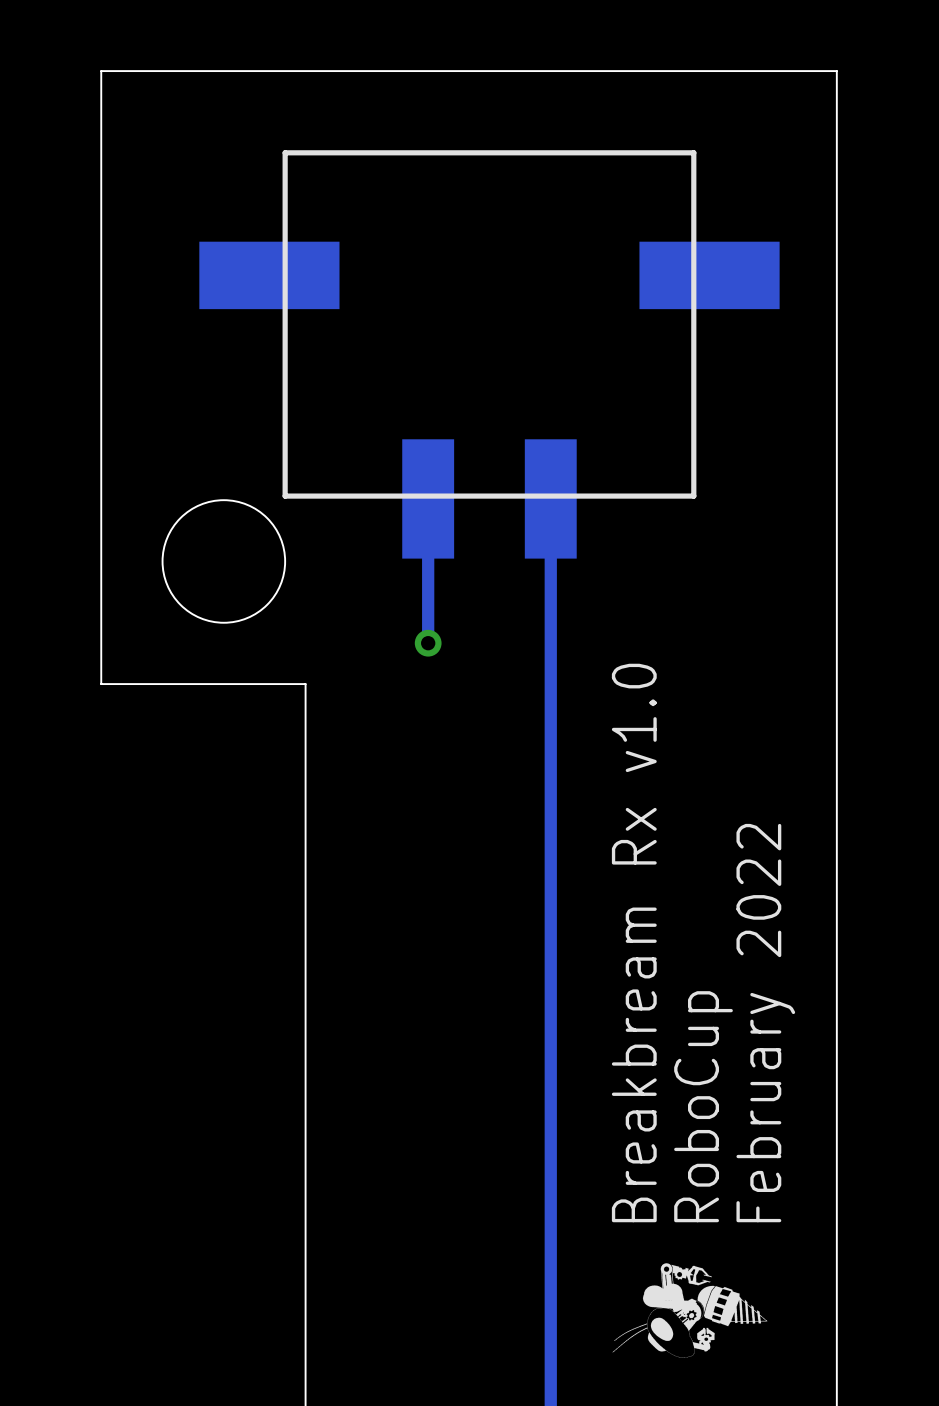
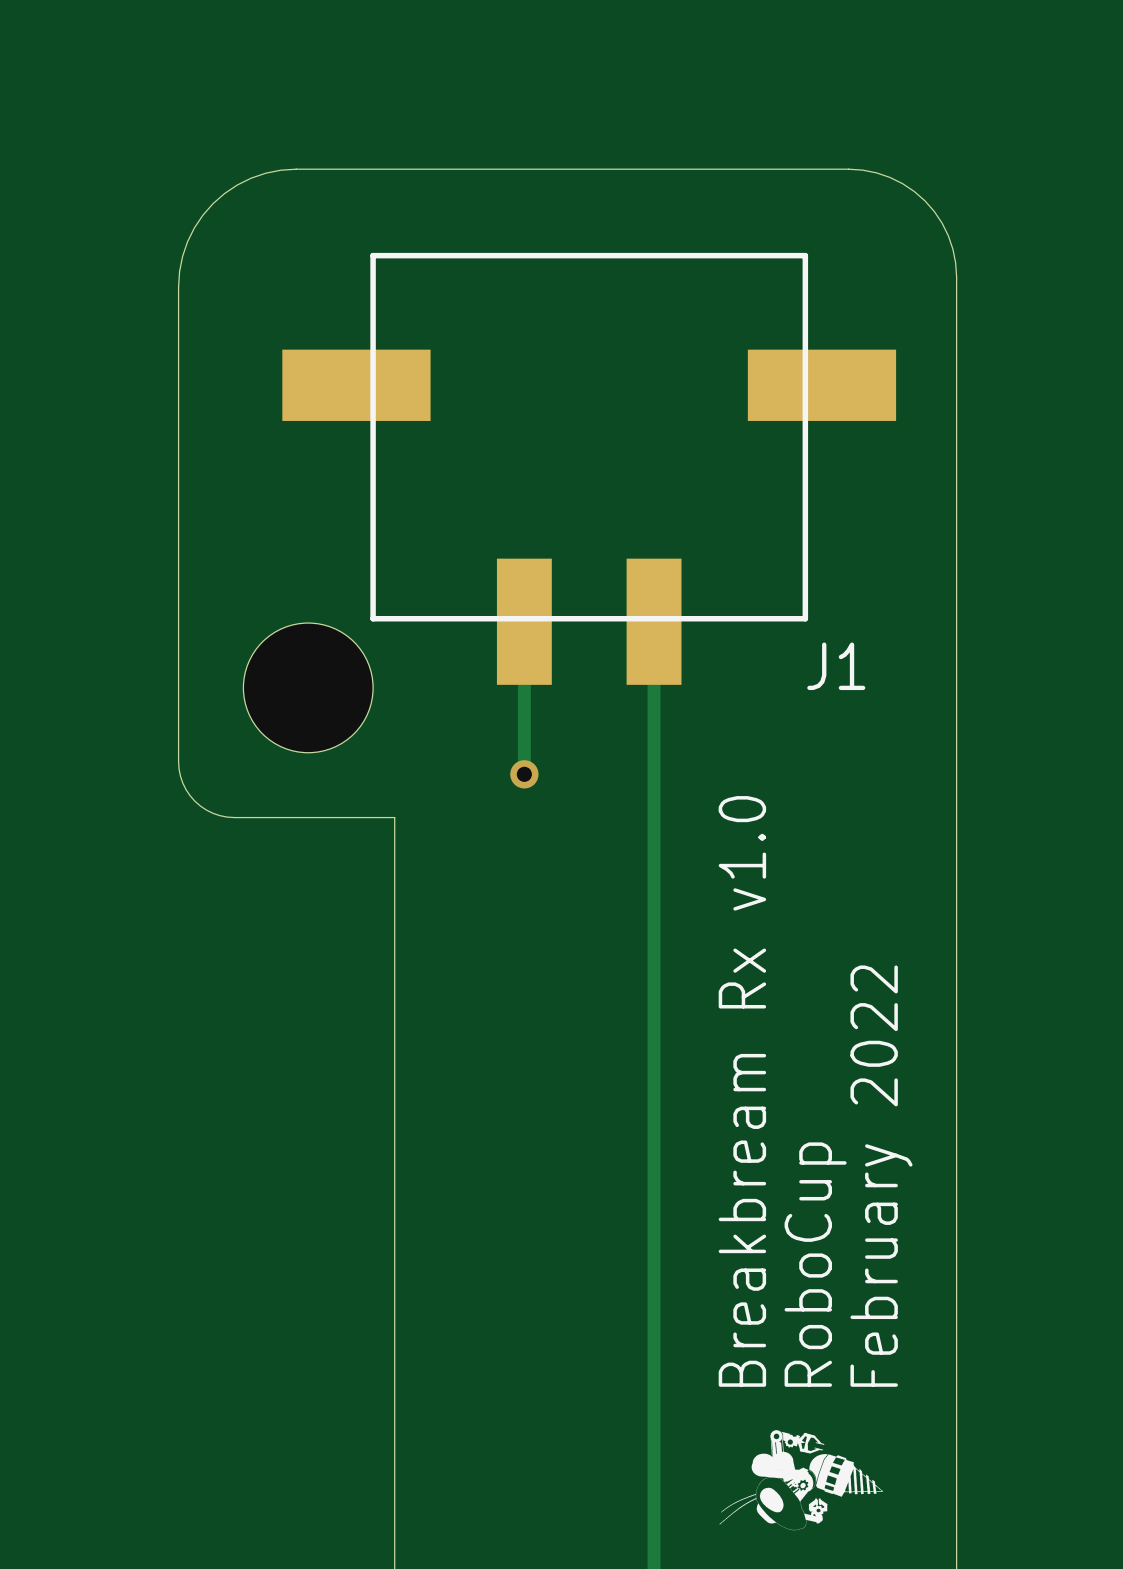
board edge: (212, 71) (101, 71) (101, 182) -> (296, 169) (280, 170) (251, 178) (237, 184) (213, 203) (194, 228) (187, 241) (179, 271) (178, 286)
board edge: (734, 71) (836, 71) (836, 173) -> (848, 169) (862, 170) (889, 177) (902, 183) (924, 200) (942, 223) (948, 235) (955, 263) (956, 277)
text: none -> J1 (836, 666)
board edge: (101, 631) (101, 684) (153, 684) -> (178, 761) (182, 783) (194, 801) (213, 813) (234, 817)

